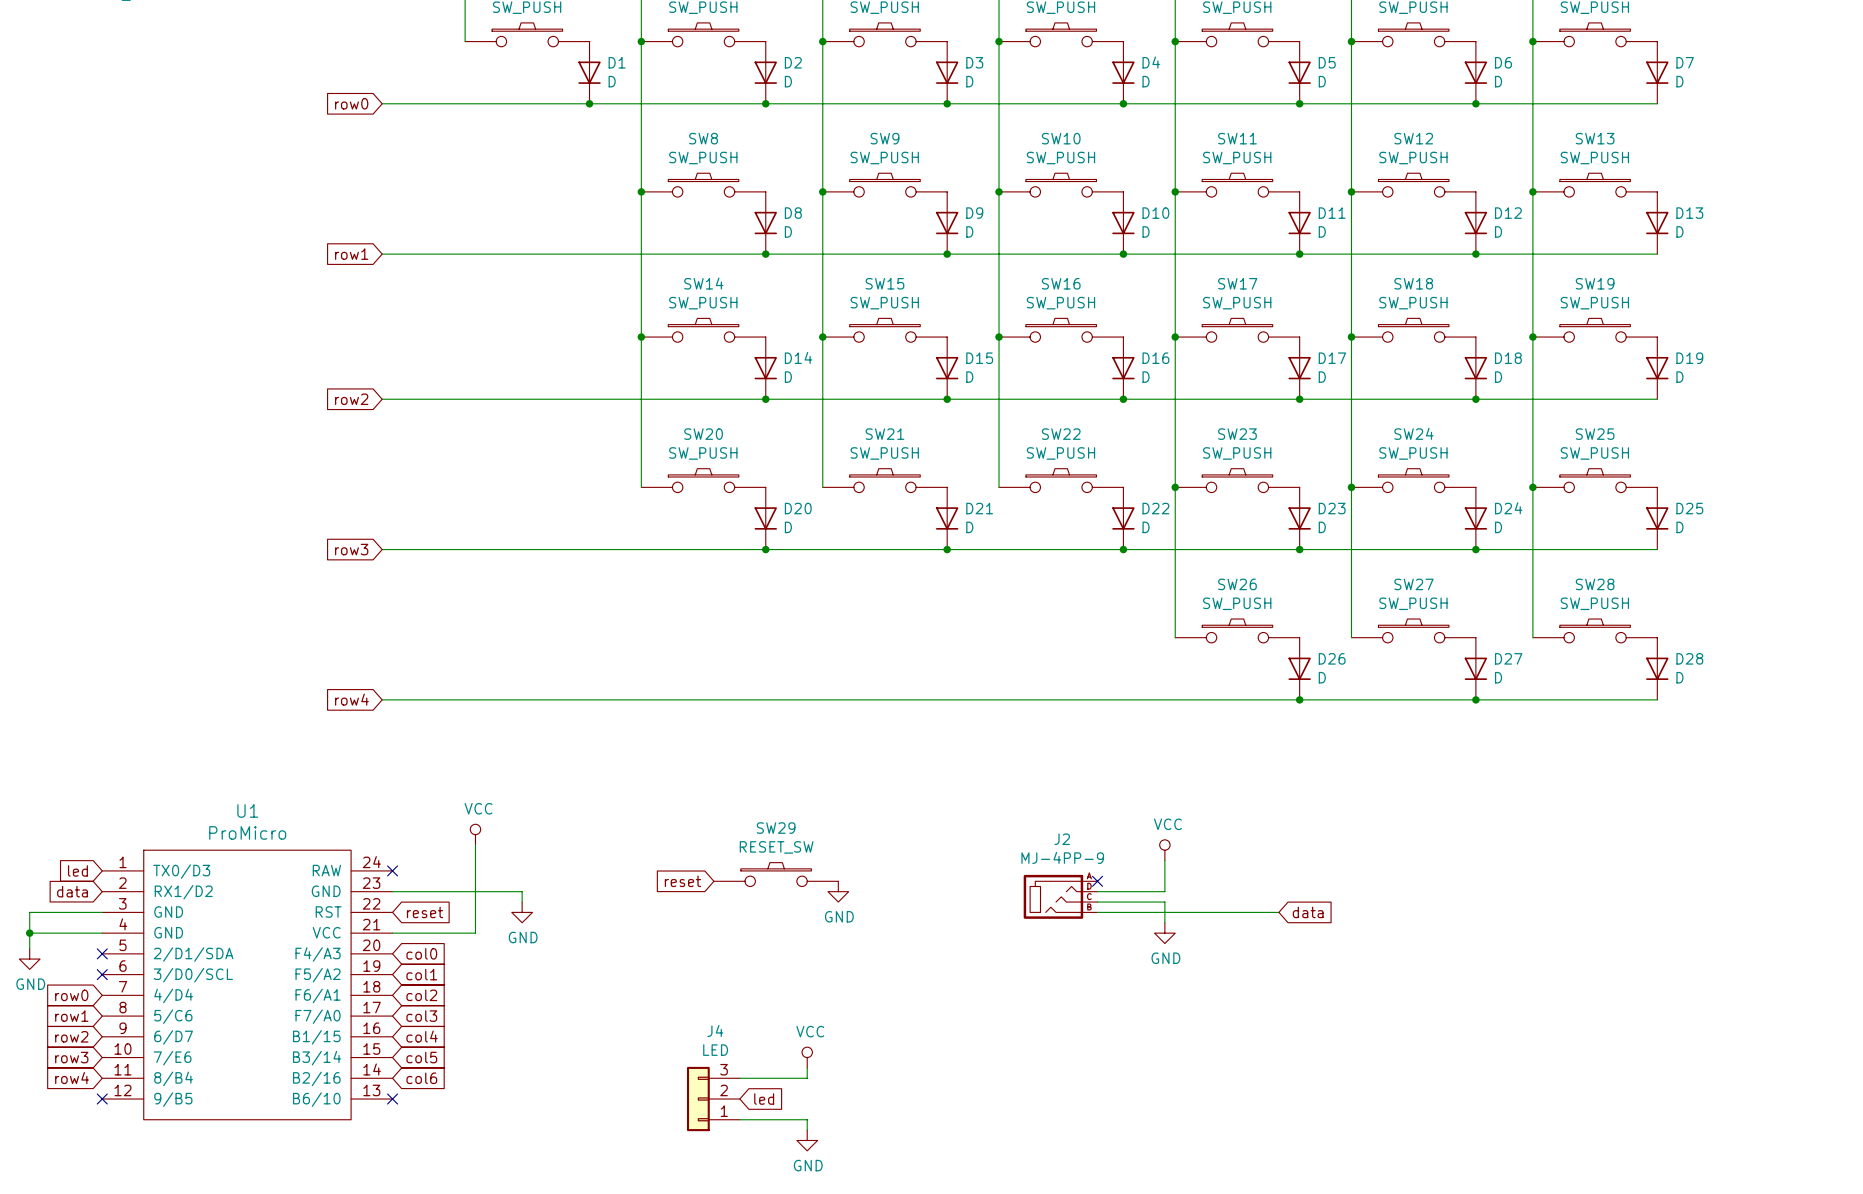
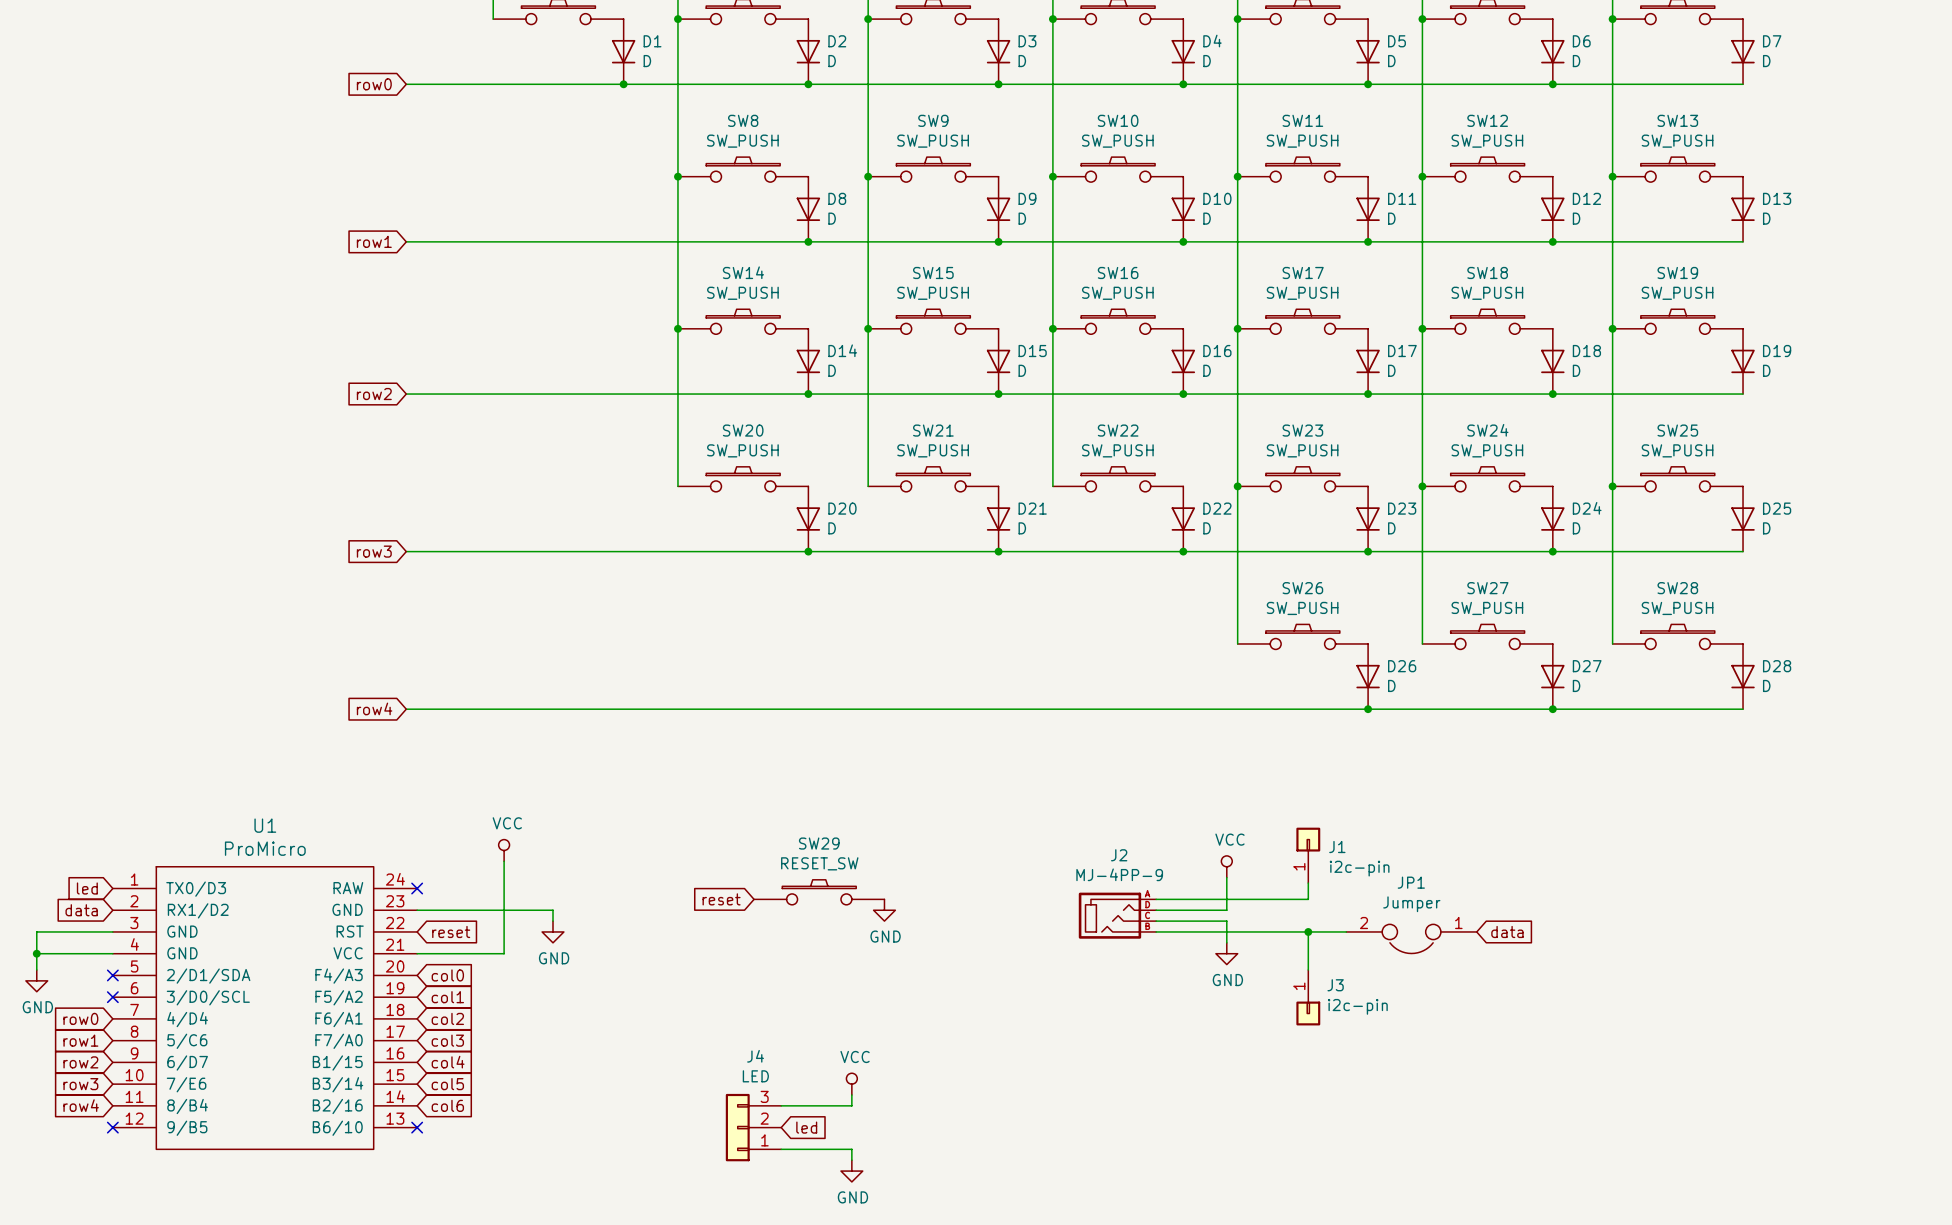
J1: none -> i2c-pin (1308, 855)
wire: none -> (1308, 883) (1308, 899) (1156, 899)
no-connect mark: (1097, 881) -> none
wire: none -> (1308, 931) (1308, 970)
junction: none -> (1308, 931)
global label position: data (1308, 912) -> data (1507, 931)
JP1: none -> Jumper (1411, 938)
J3: none -> i2c-pin (1308, 997)

